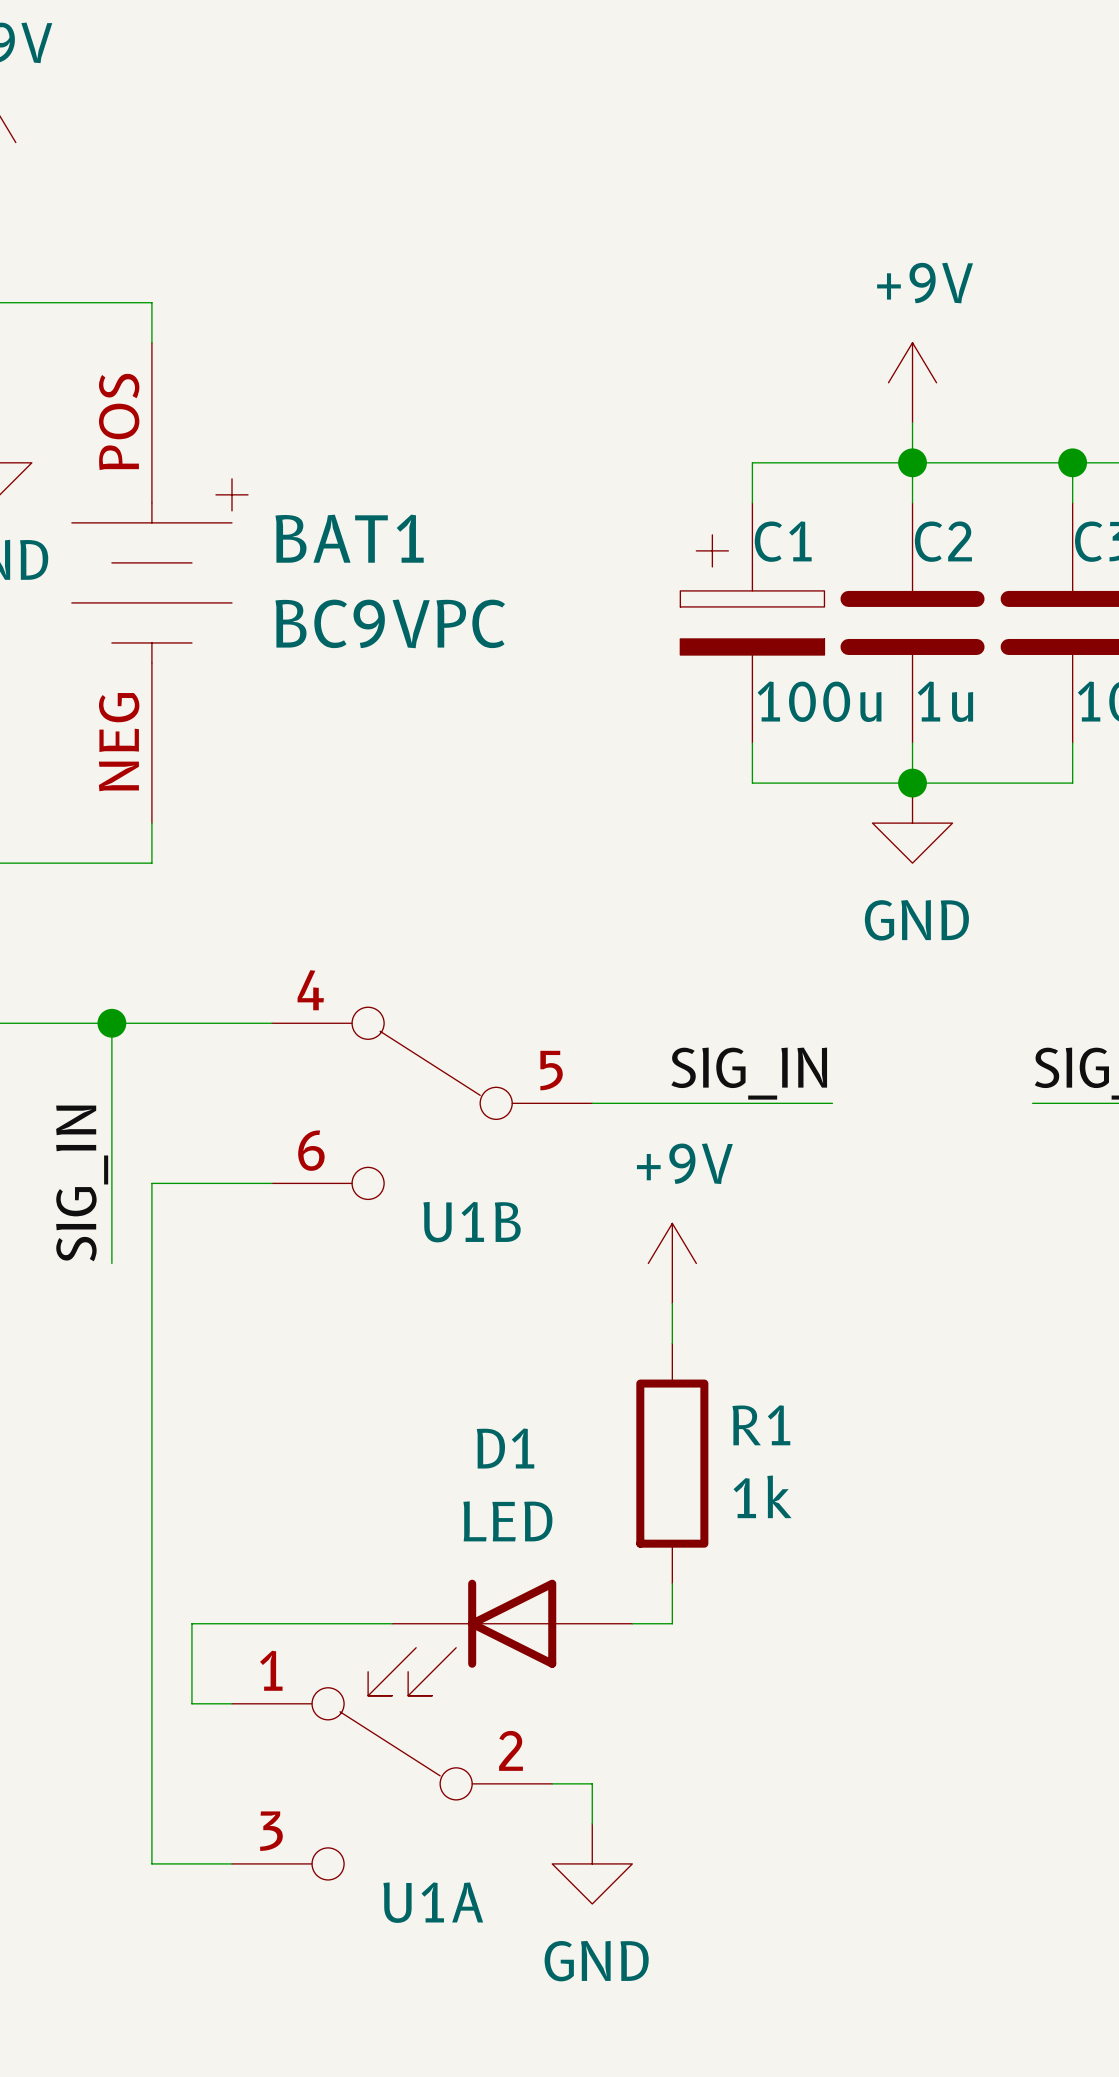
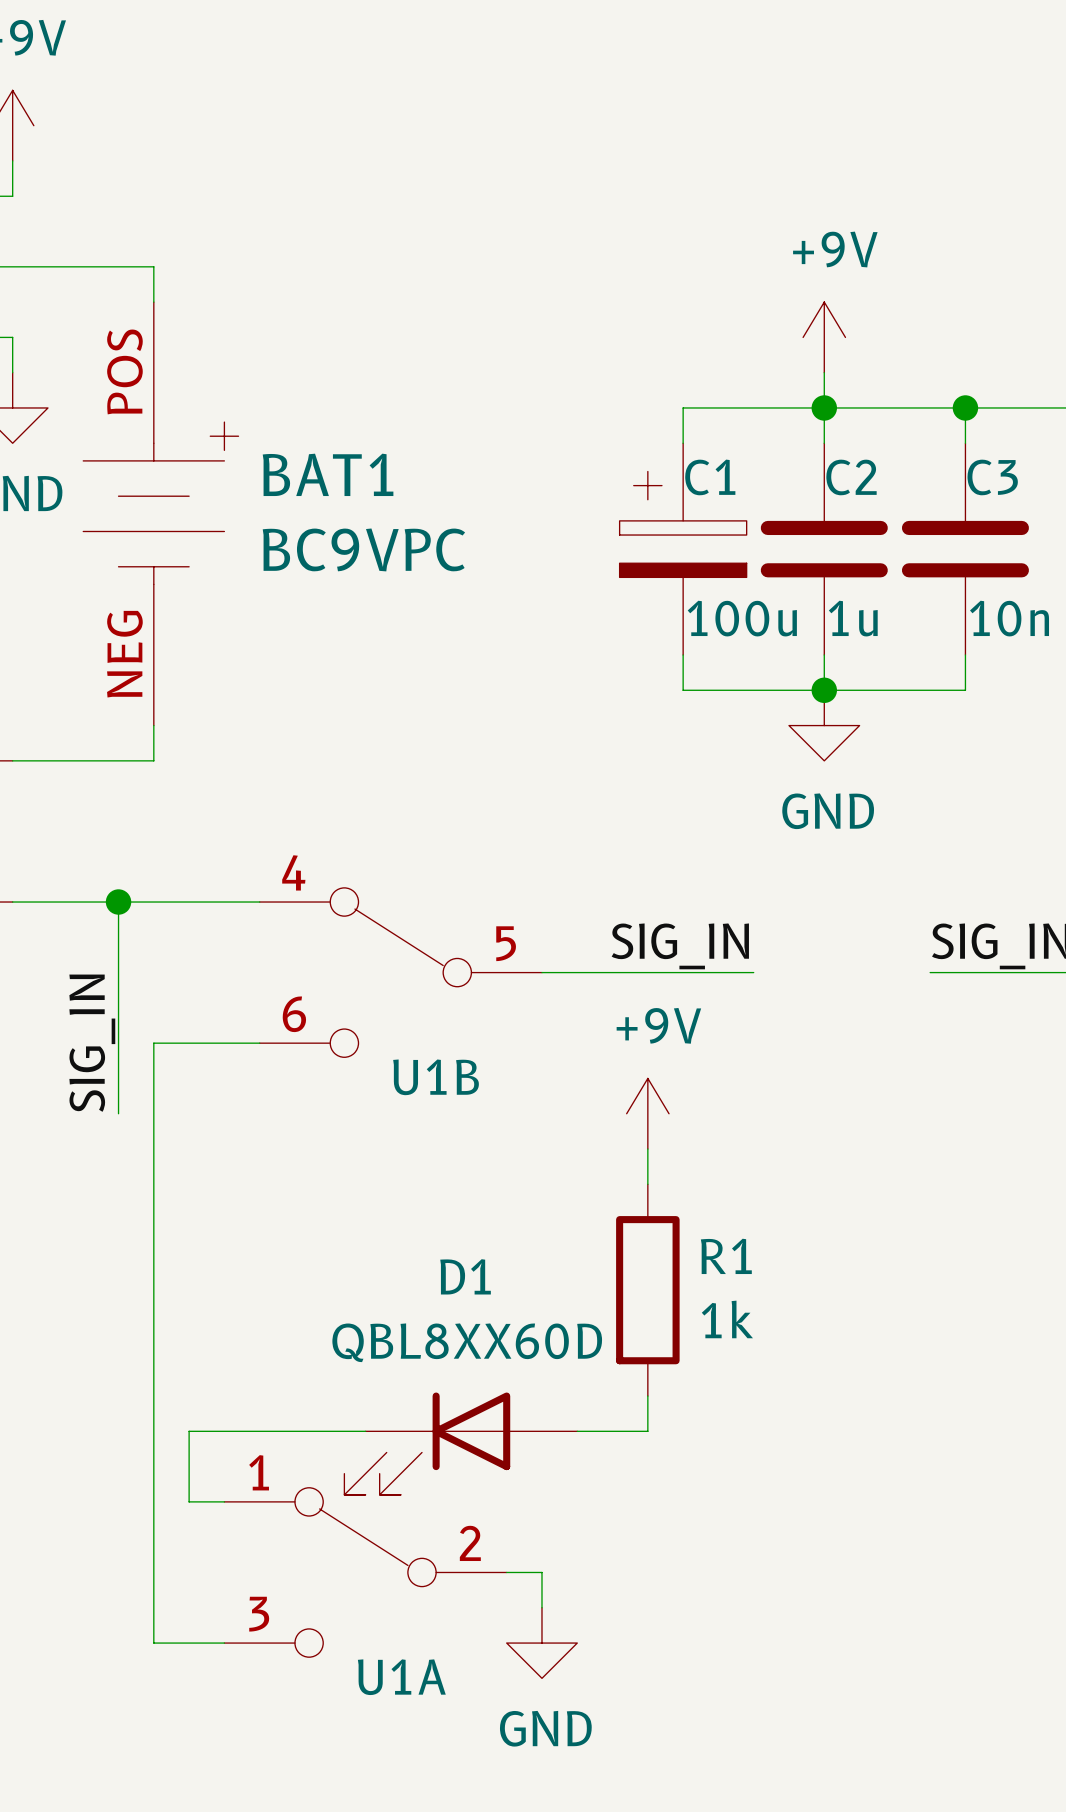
power symbol position: +9V (672, 1263) -> +9V (647, 1113)
wire: (672, 1303) (672, 1343) -> (647, 1149) (647, 1184)
R1 position: (672, 1463) -> (647, 1290)
D1 value: LED (507, 1521) -> QBL8XX60D (467, 1342)
wire: (672, 1583) (672, 1623) -> (647, 1396) (647, 1431) (612, 1431)

